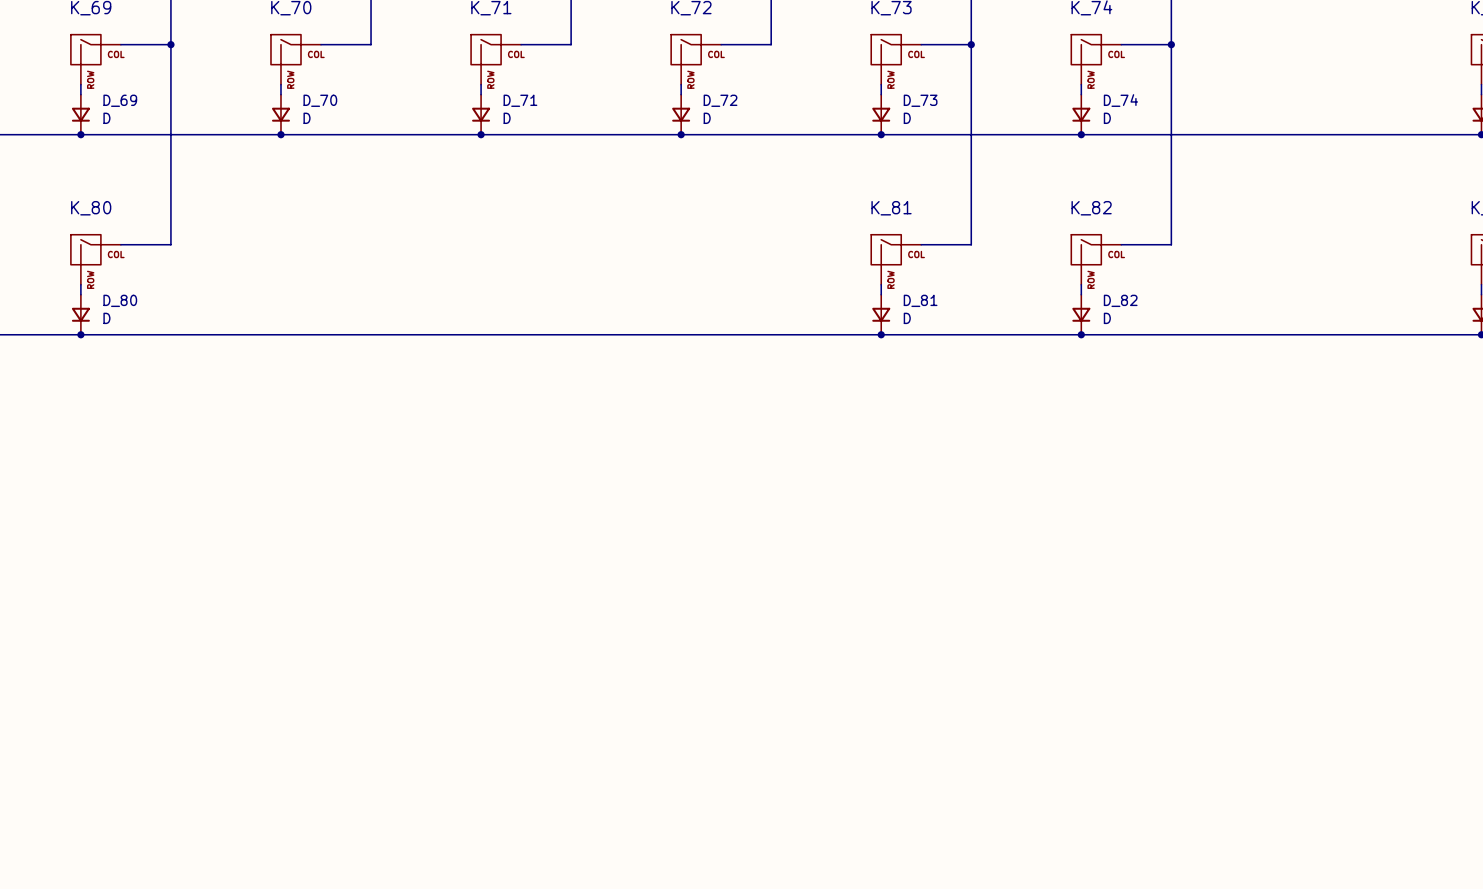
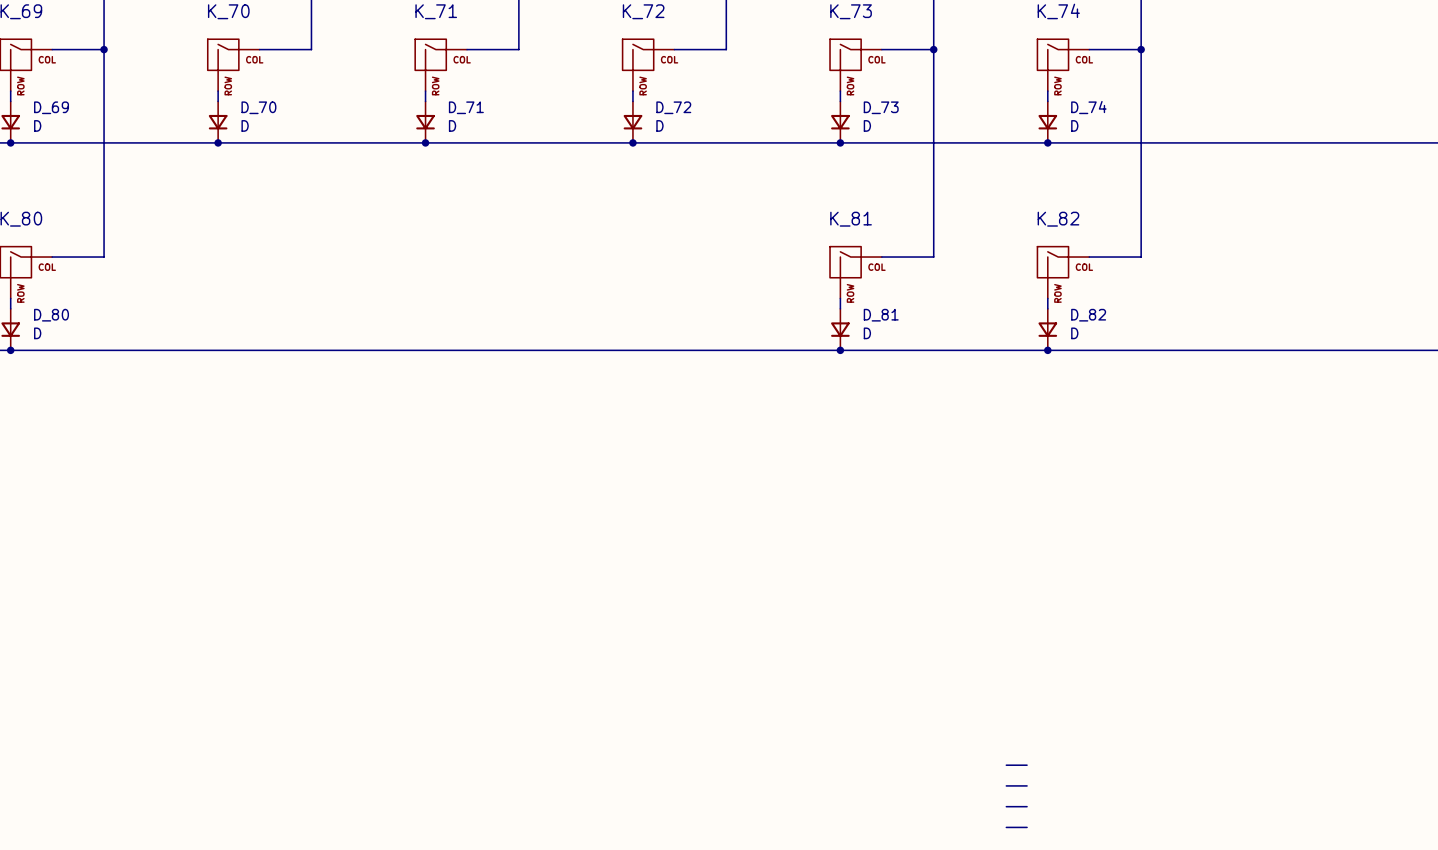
wire: none -> (1006, 765) (1027, 765)
wire: none -> (1006, 785) (1027, 785)
wire: none -> (1006, 806) (1027, 806)
wire: none -> (1006, 827) (1027, 827)

